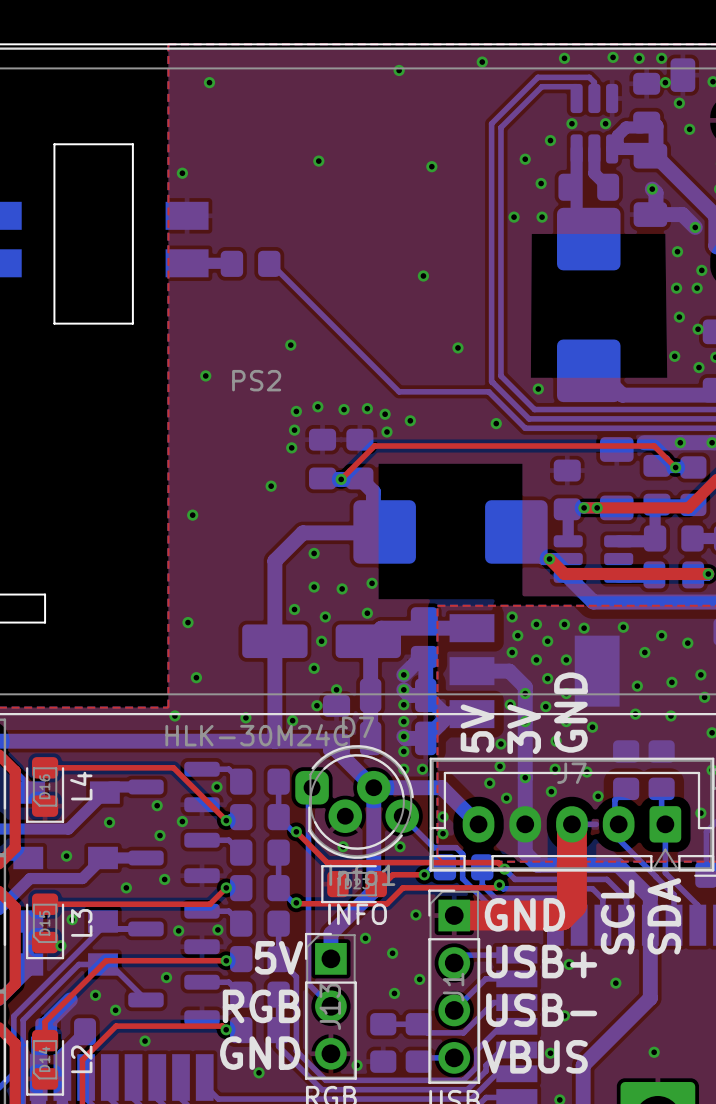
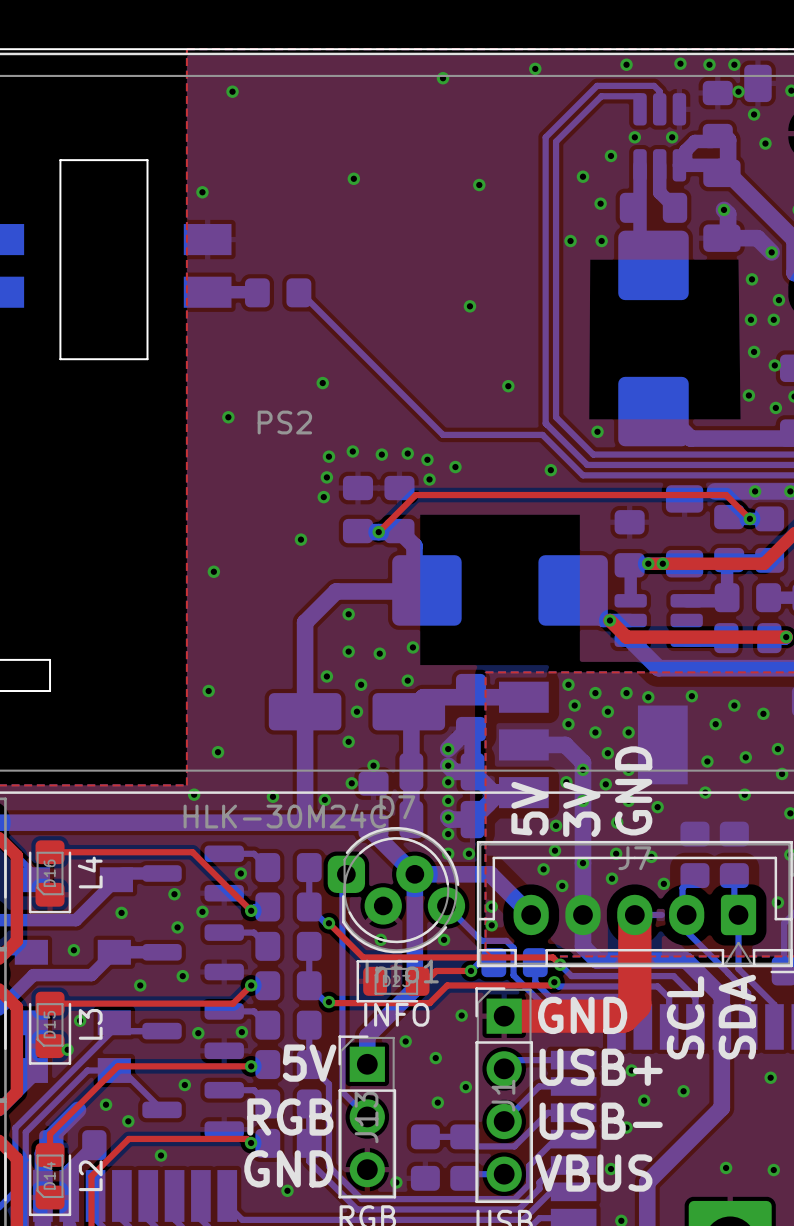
via: none -> (770, 1077)
via: none -> (644, 1100)
via: none -> (773, 1170)

